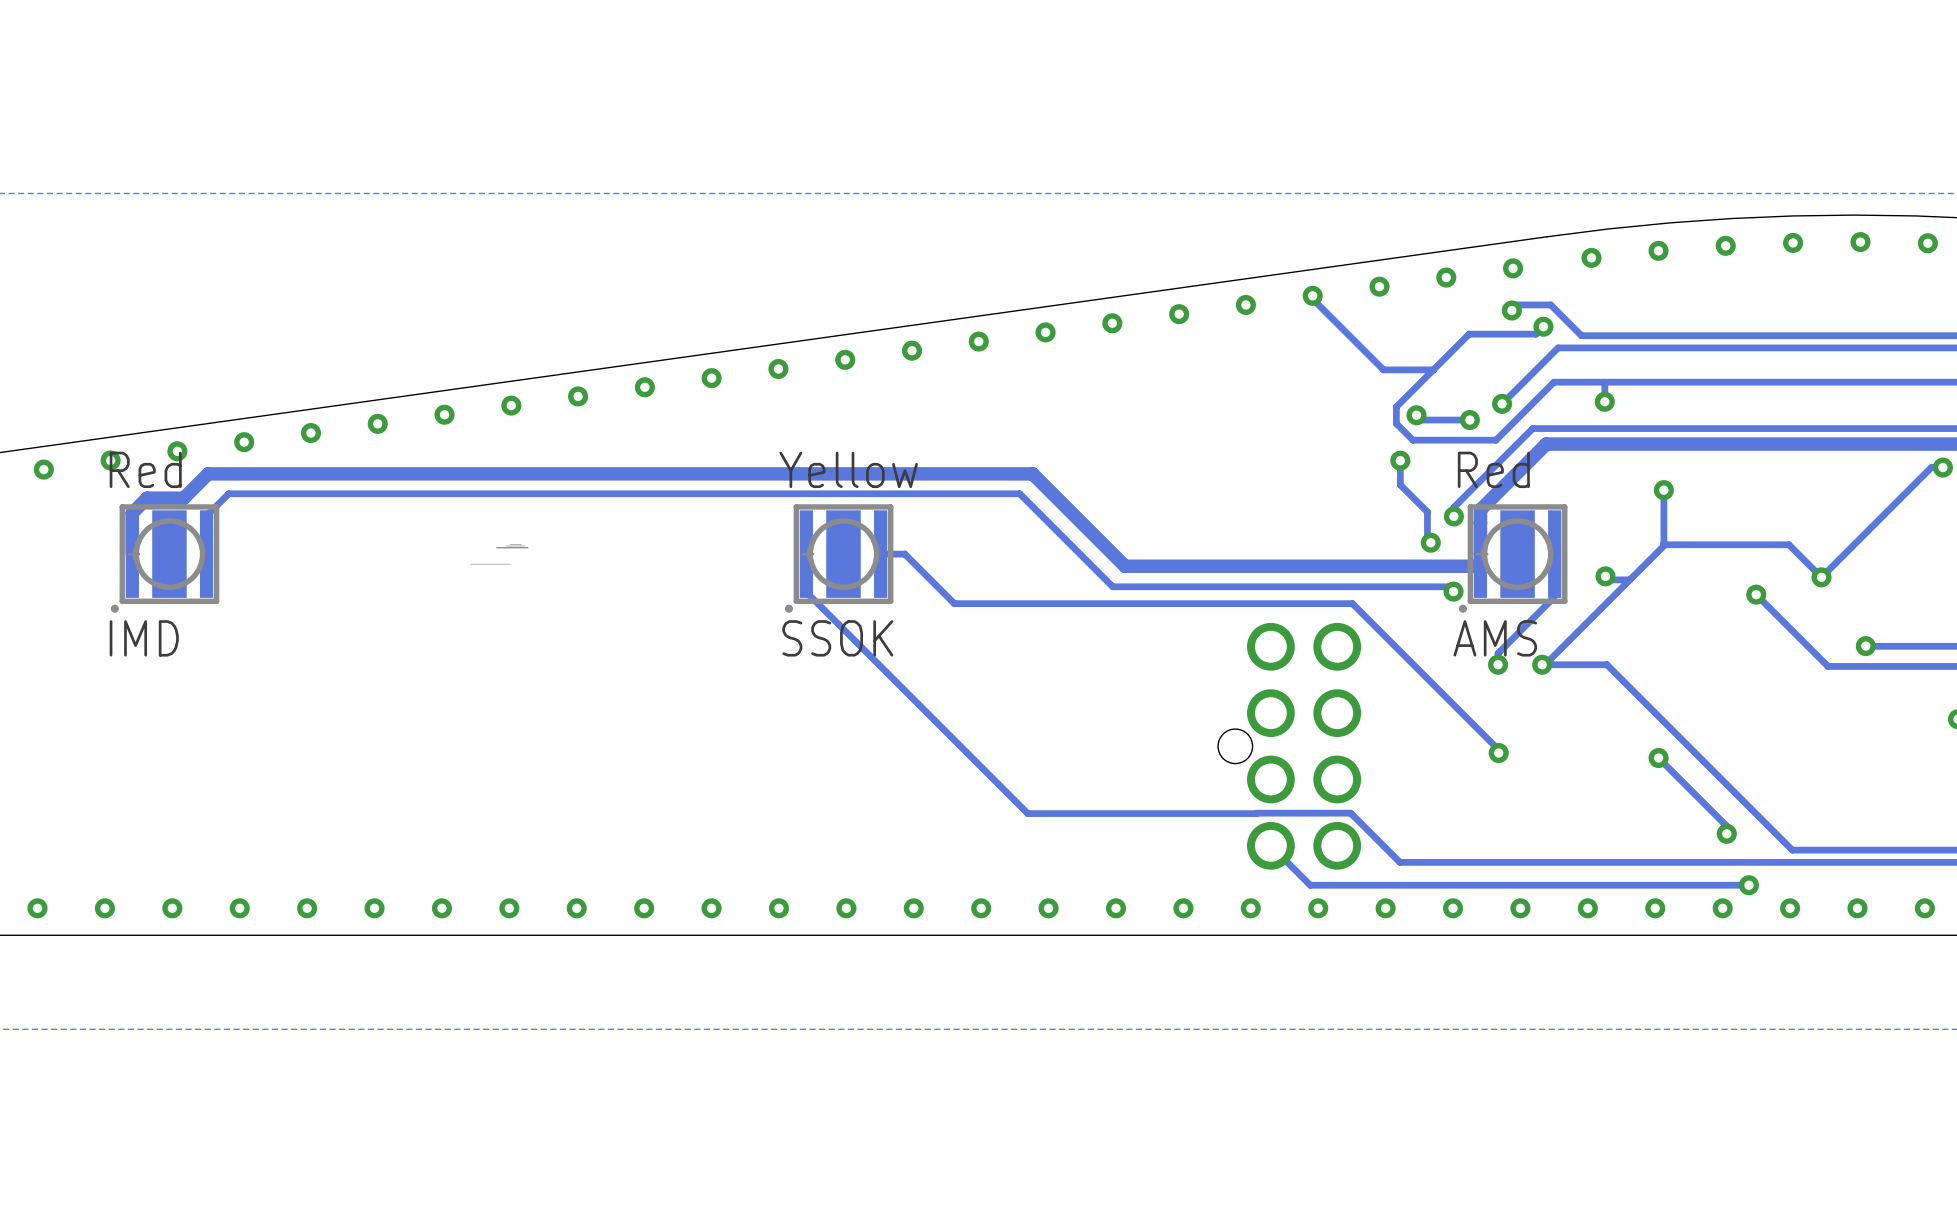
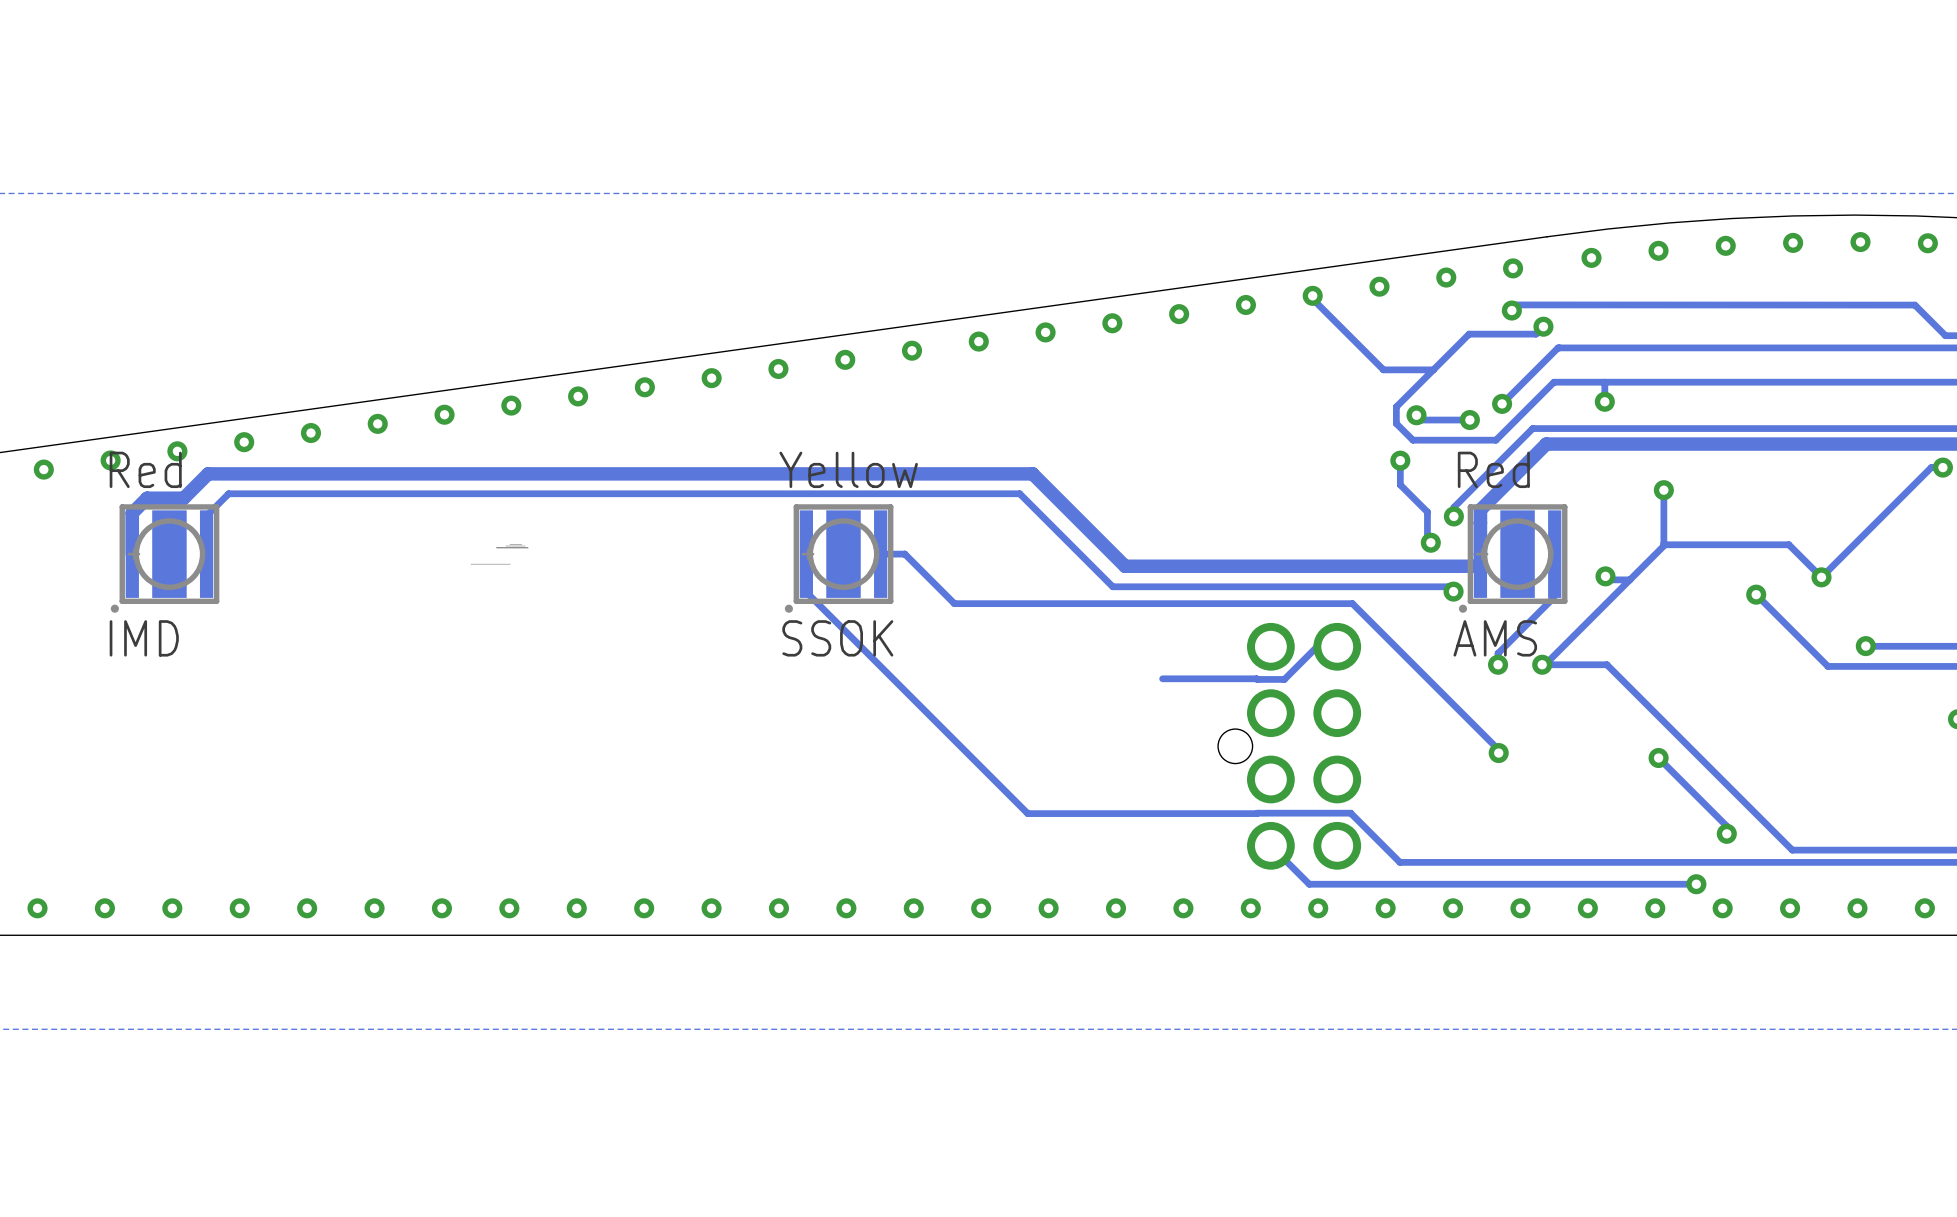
track: (1550, 304) (1581, 335) (1945, 335) -> (1550, 304) (1914, 305) (1945, 335)
track: none -> (1337, 646) (1317, 646) (1284, 679) (1162, 678)
track: (1309, 884) (1748, 885) -> (1309, 884) (1696, 884)
via position: (1748, 885) -> (1696, 884)

